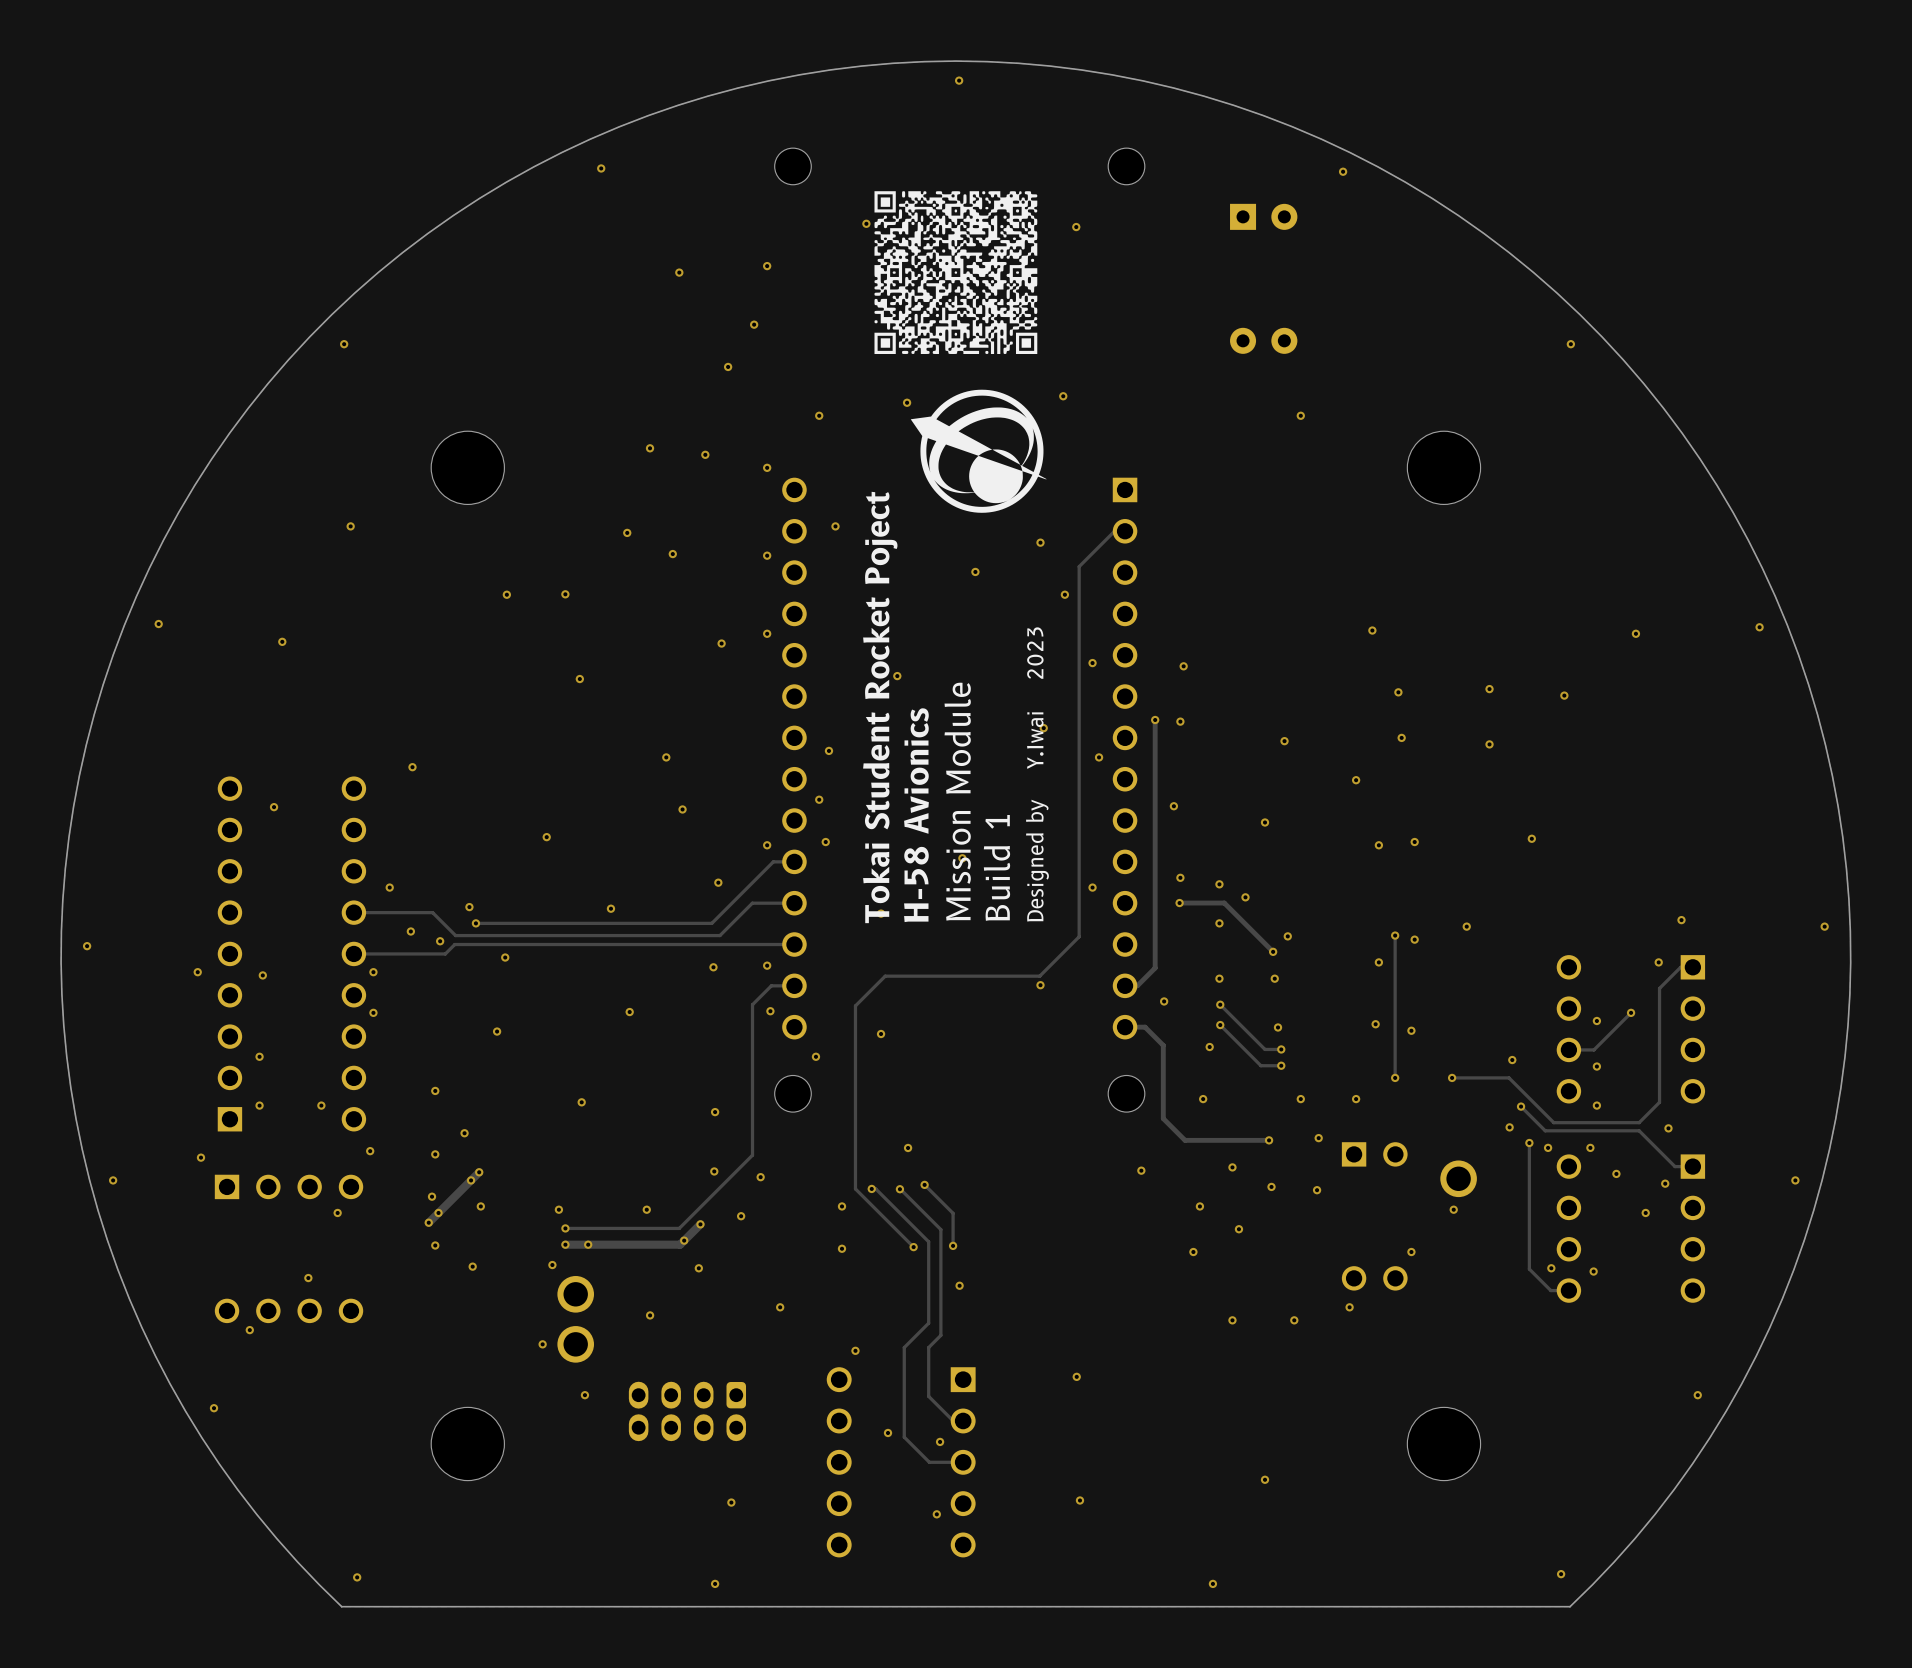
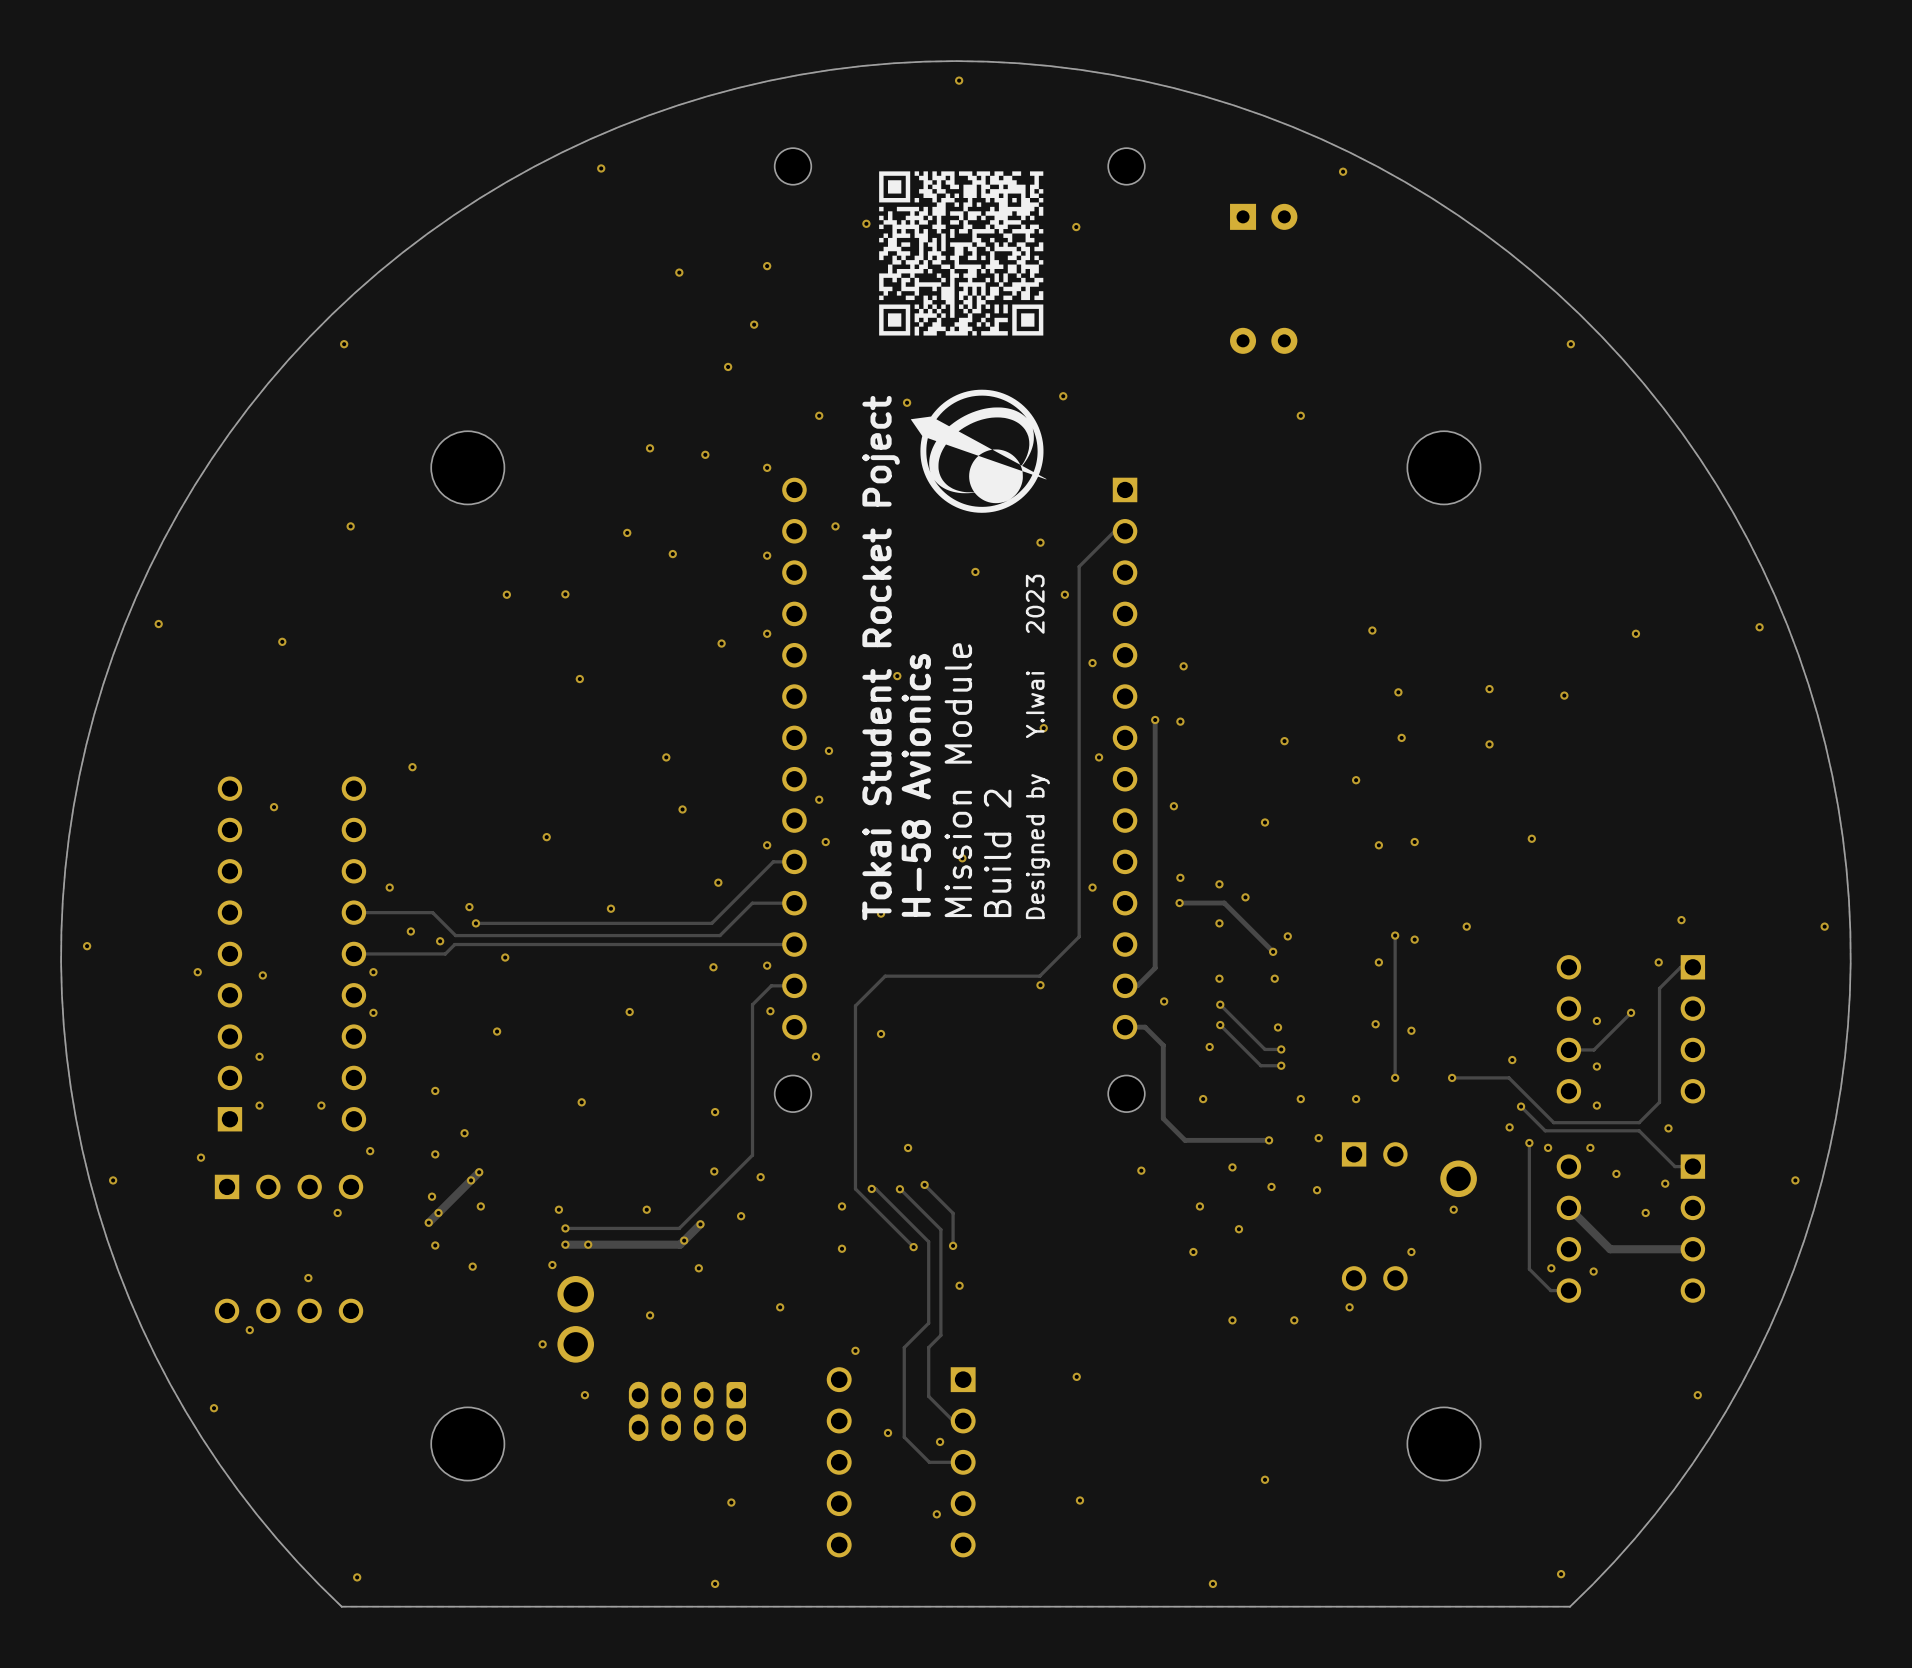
drawing: none -> [879, 171, 1044, 336]
drawing: [874, 191, 1038, 354] -> none
text: Build 1 (996, 867) -> Build 2 (997, 853)
track: none -> (1568, 1207) (1610, 1249) (1692, 1249)

